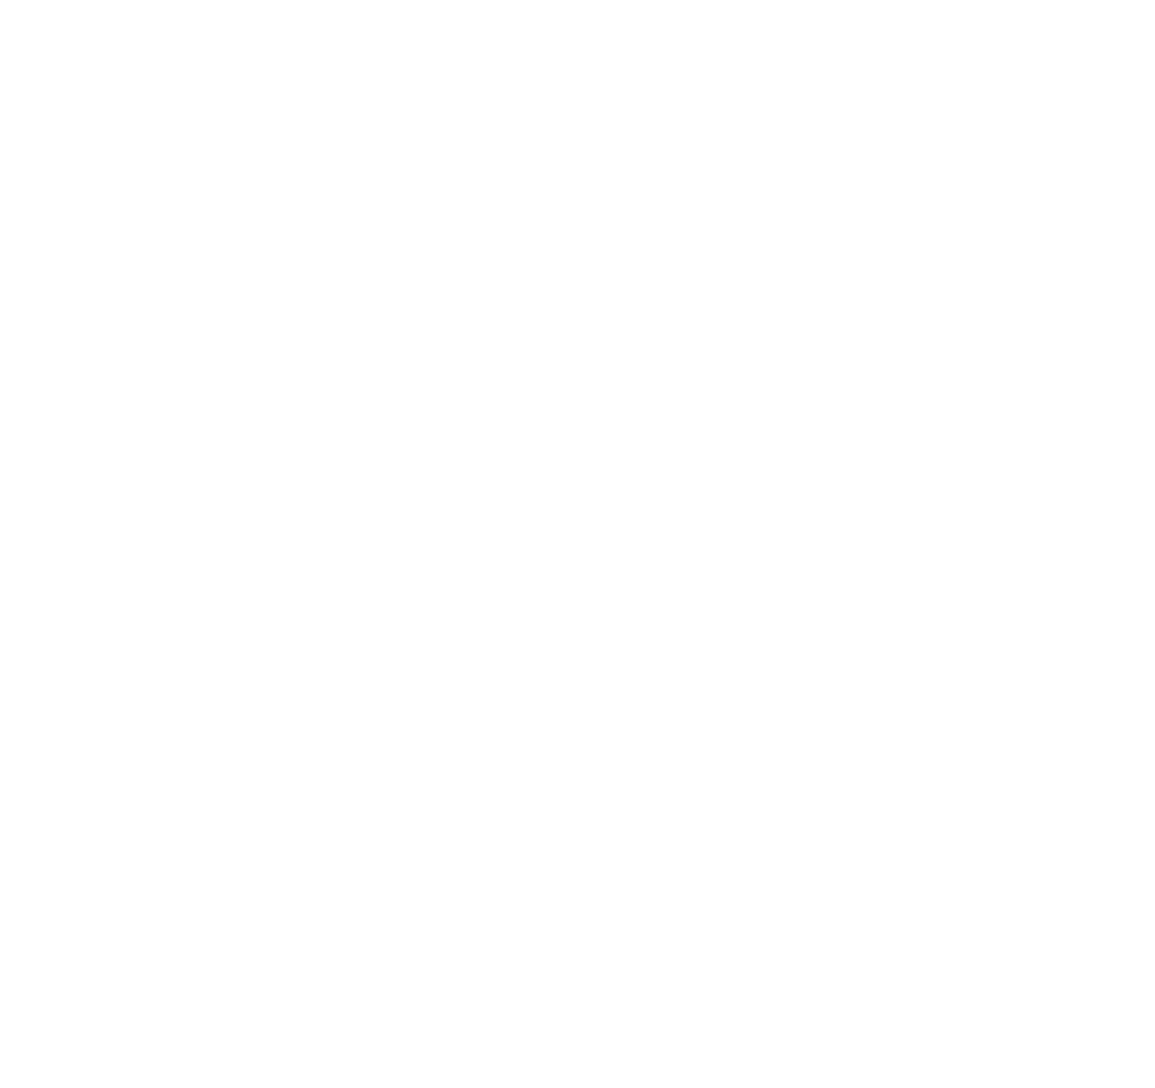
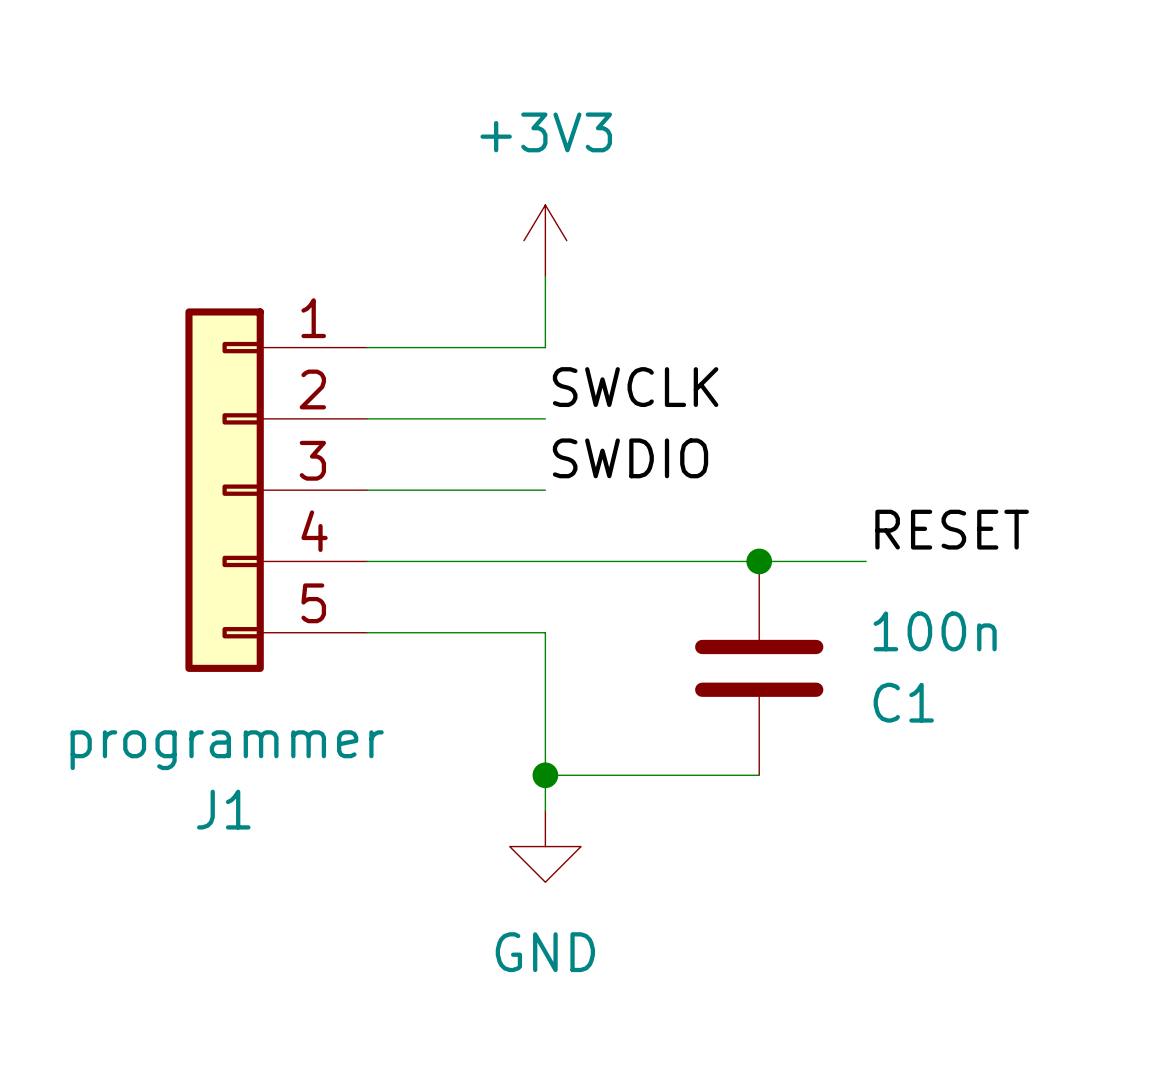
power symbol: none -> +3V3 (545, 240)
wire: none -> (545, 276) (545, 347) (367, 347)
label: none -> SWCLK (635, 387)
wire: none -> (367, 418) (545, 418)
label: none -> SWDIO (630, 458)
J1: none -> programmer (276, 490)
wire: none -> (367, 490) (545, 490)
label: none -> RESET (952, 529)
wire: none -> (367, 561) (866, 561)
junction: none -> (759, 561)
wire: none -> (367, 632) (545, 632) (545, 810)
C1: none -> 100n (759, 668)
wire: none -> (545, 775) (759, 775)
junction: none -> (545, 775)
power symbol: none -> GND (545, 846)

